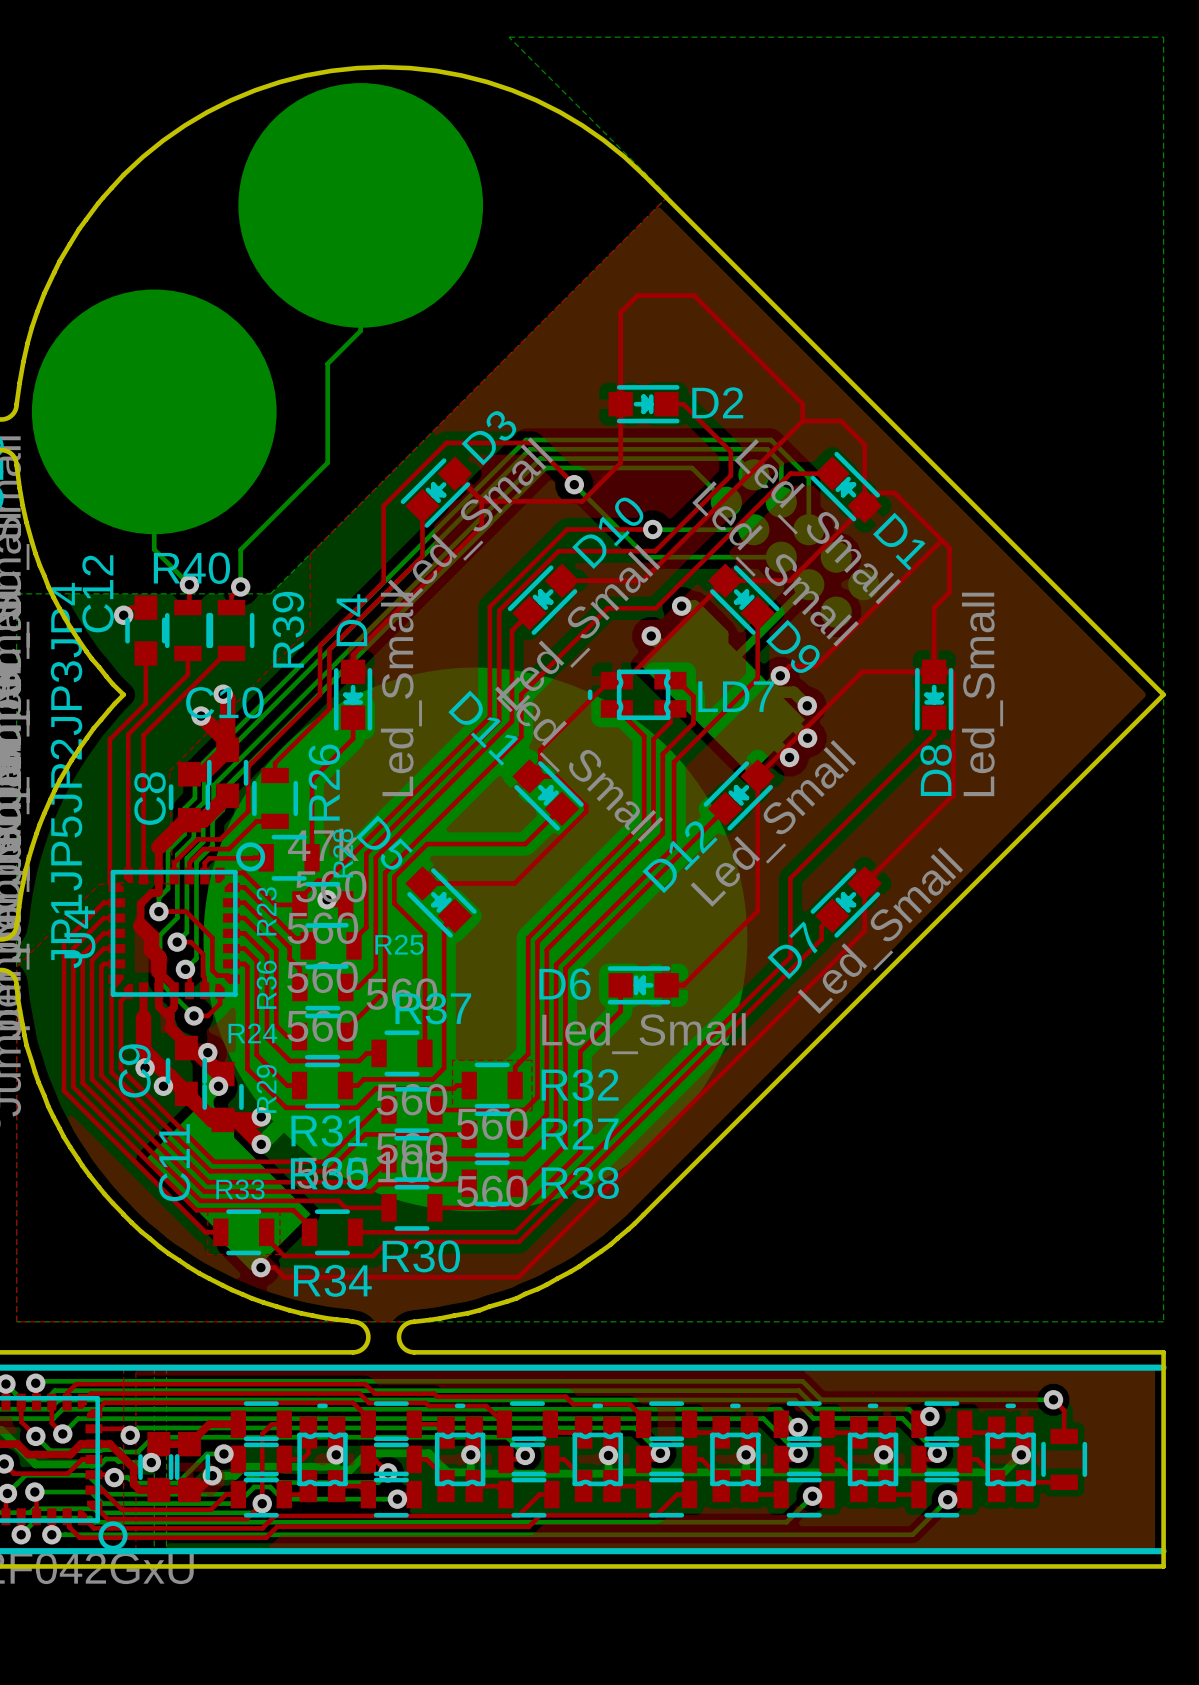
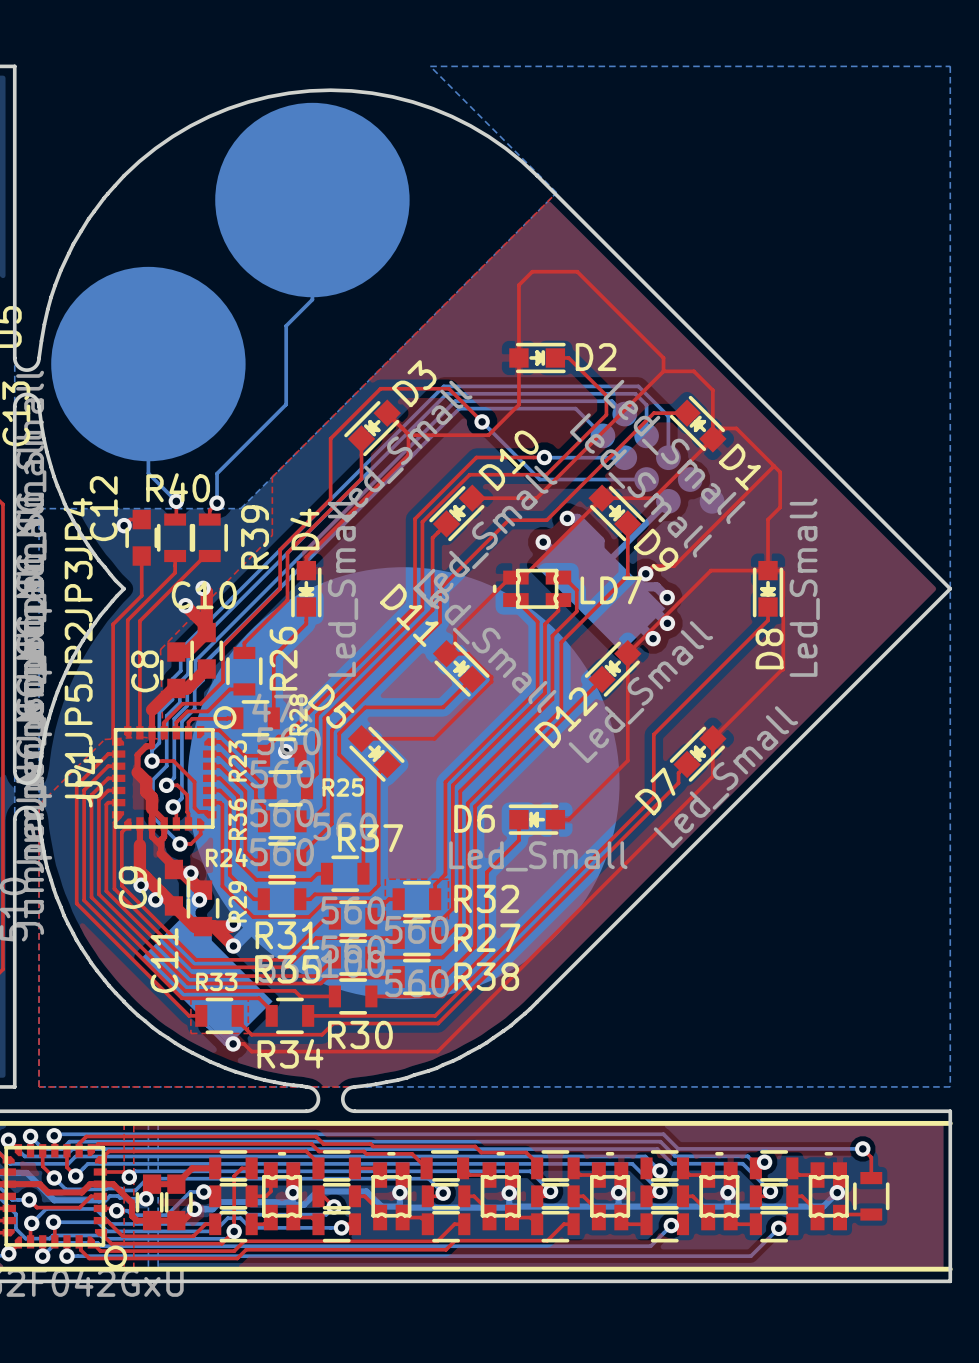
part footprint: [710, 459, 880, 628] -> [590, 401, 725, 514]

